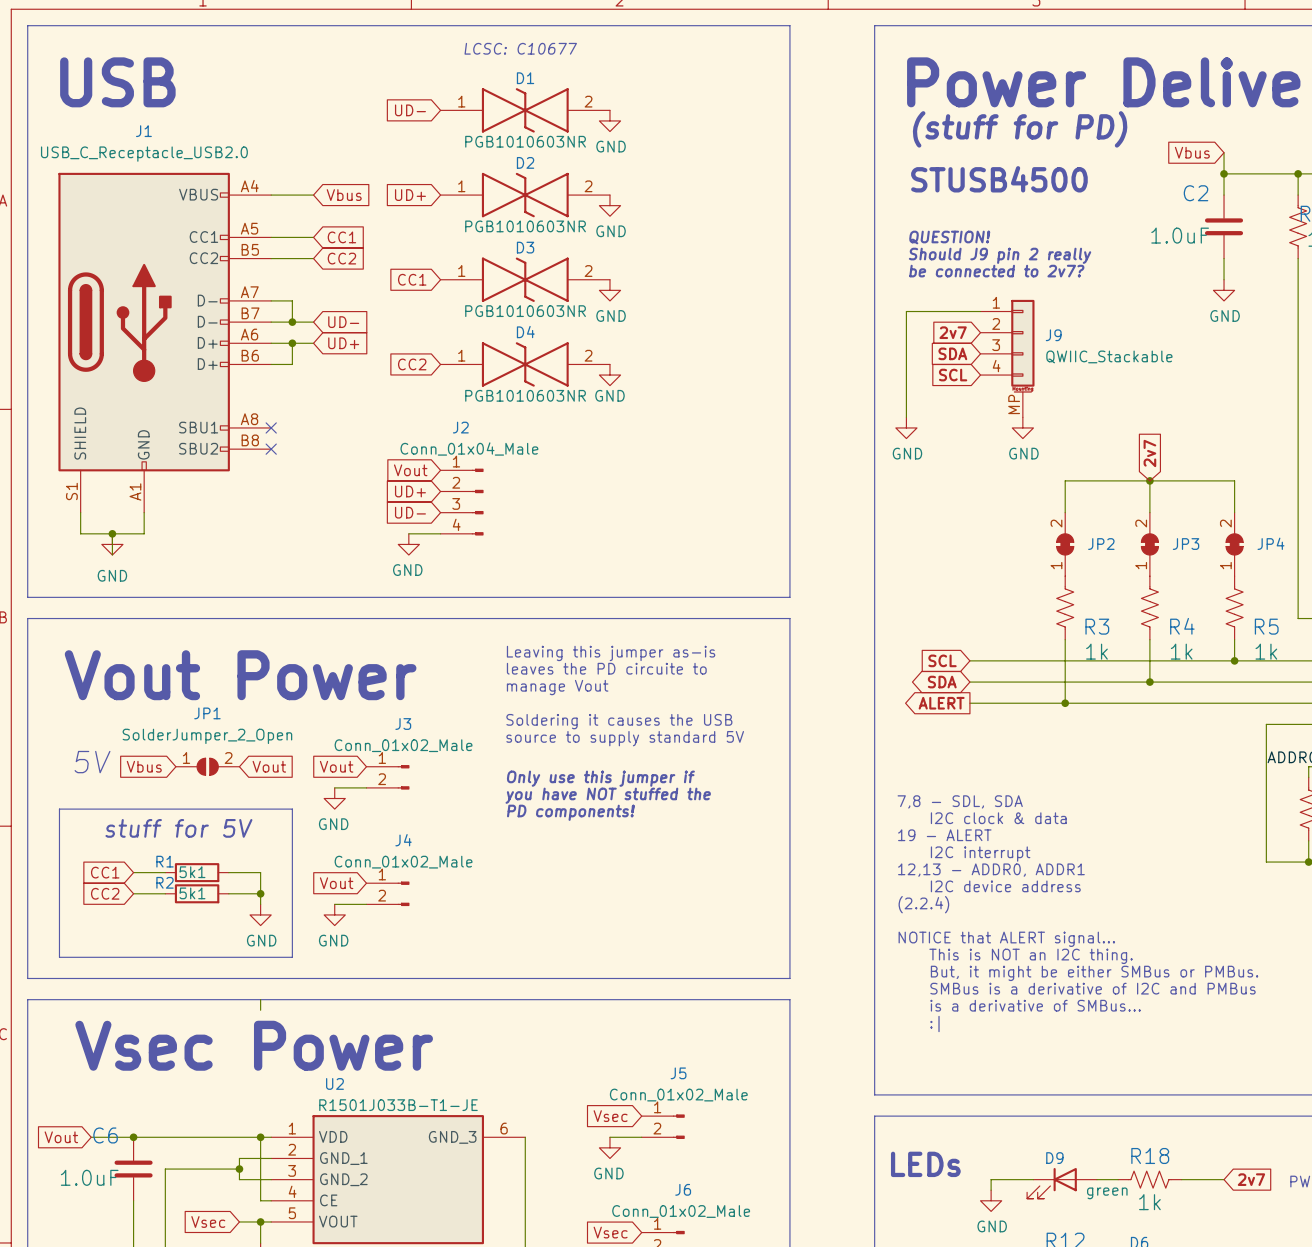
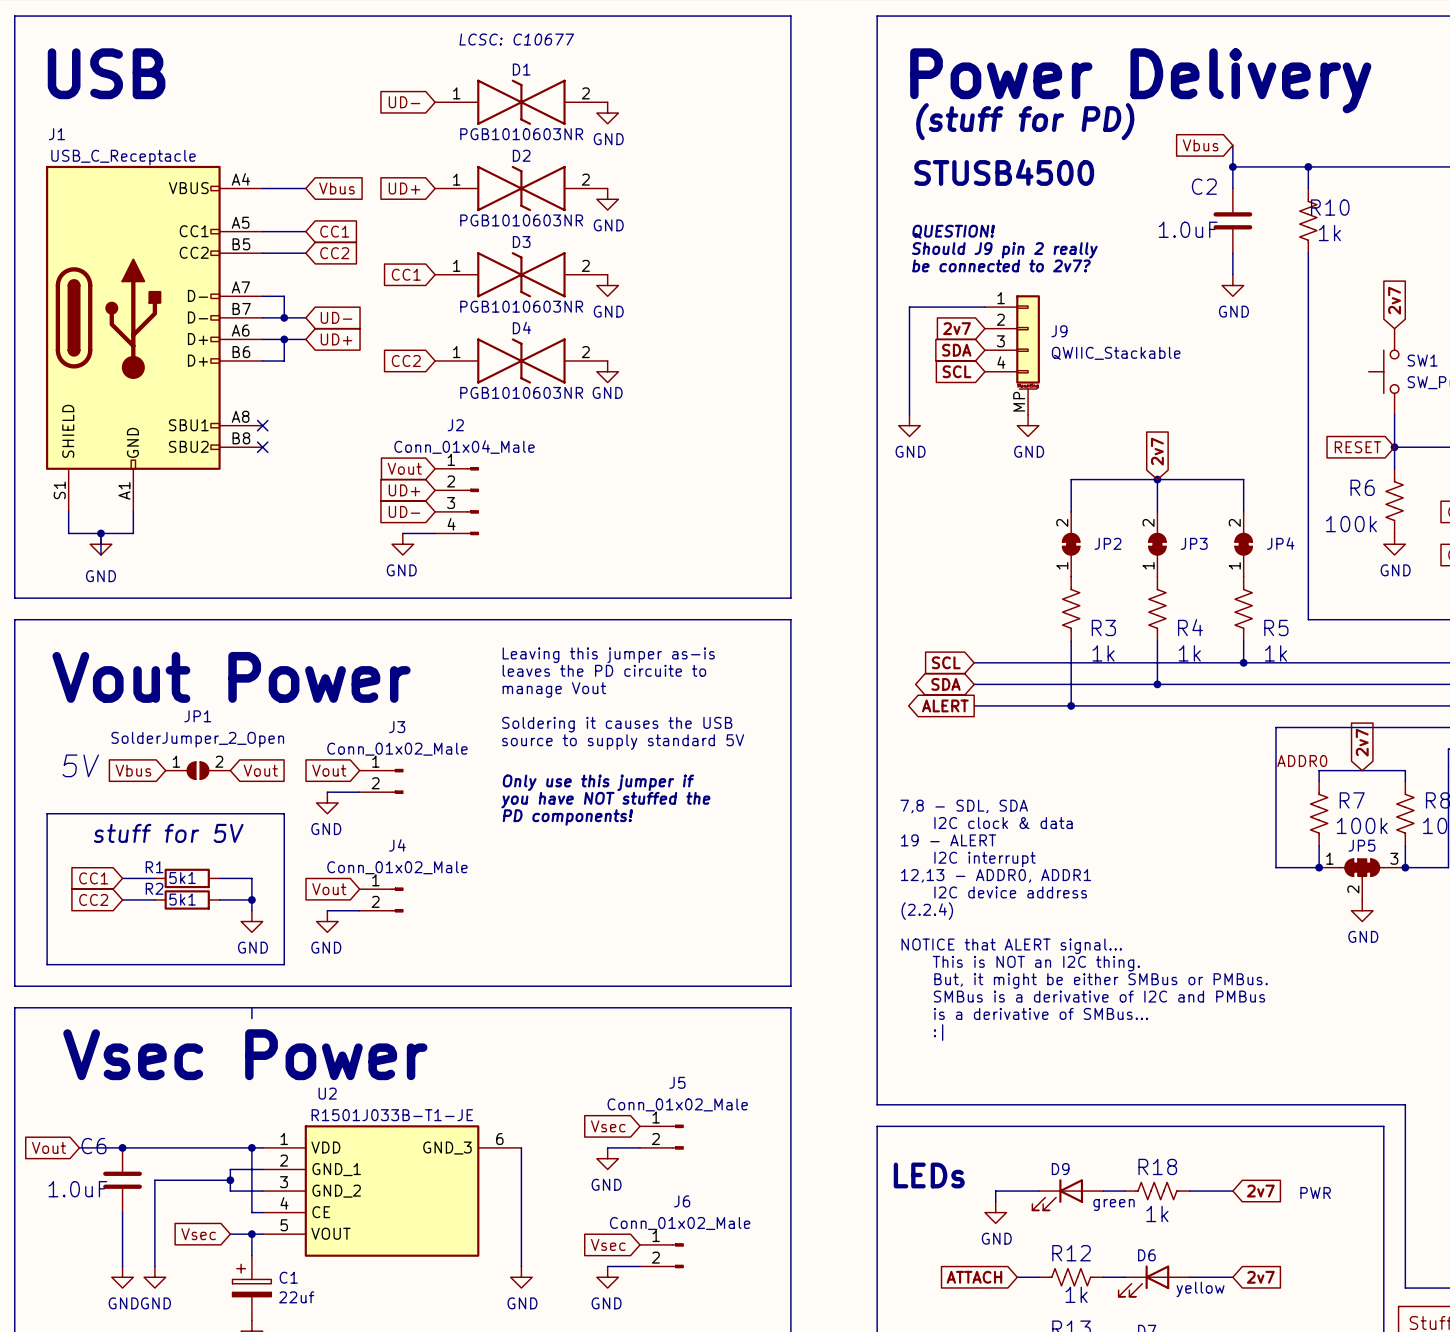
J1 name position: J1 (143, 131) -> J1 (56, 134)
J1 value: USB_C_Receptacle_USB2.0 (144, 154) -> USB_C_Receptacle (123, 157)

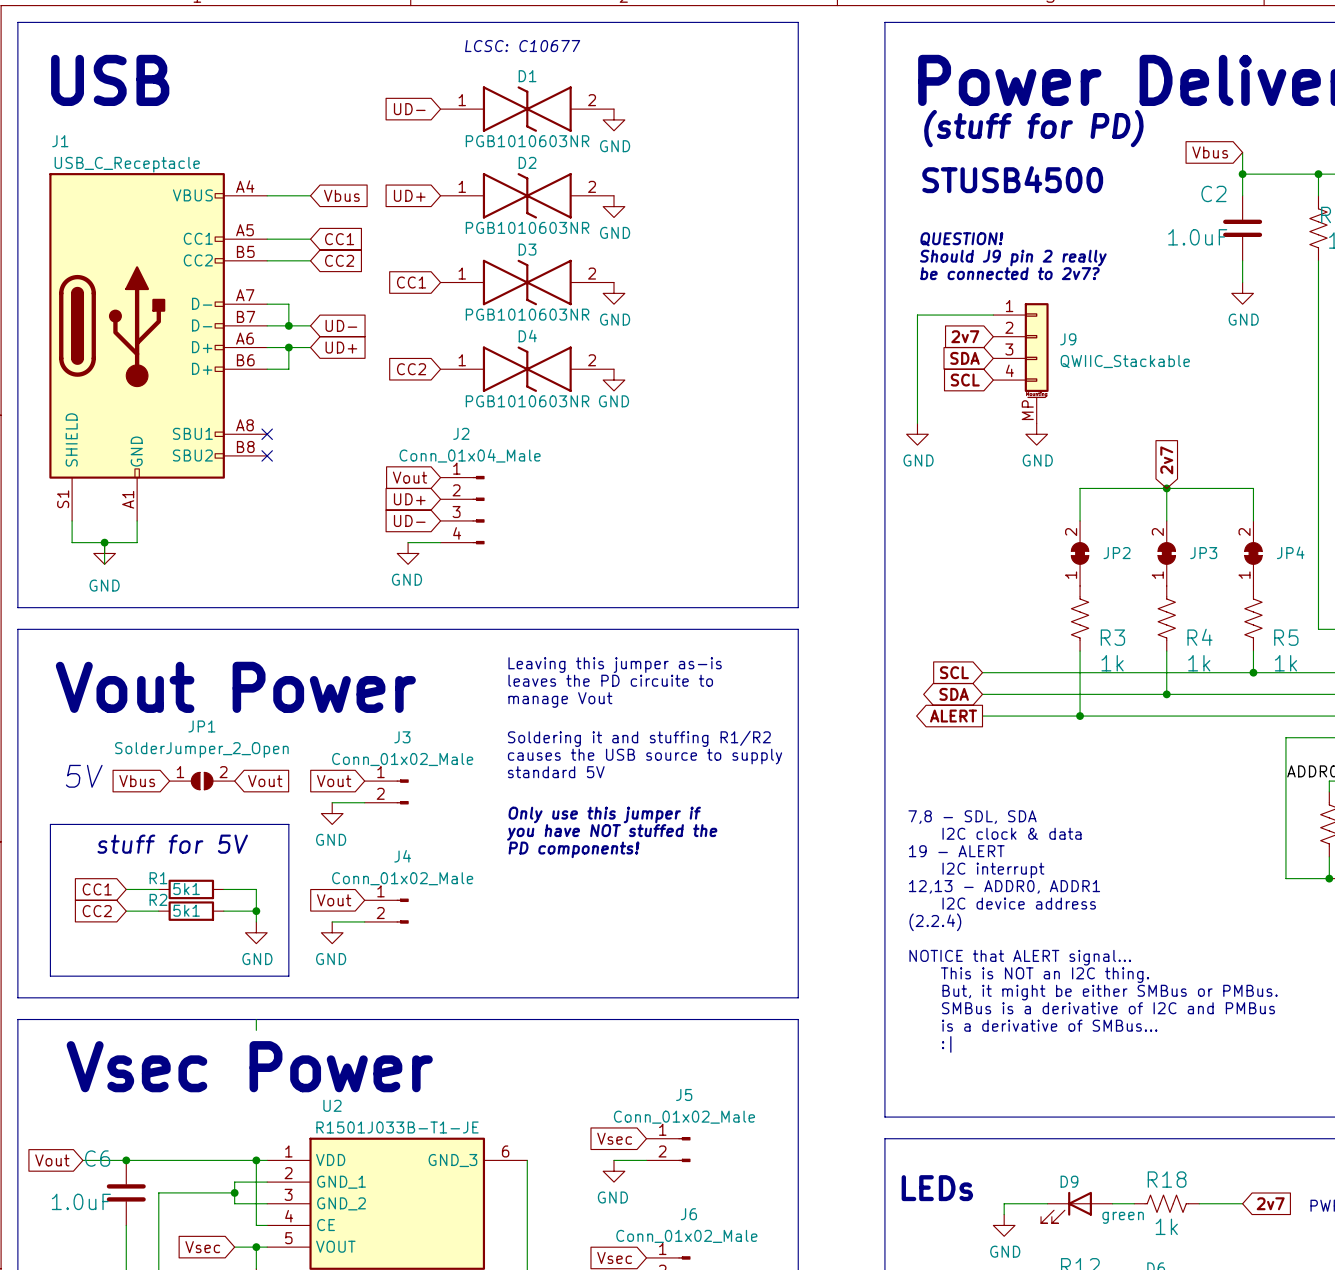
text: Soldering it causes the USB (617, 724) -> Soldering it and stuffing R1/R2 (639, 738)
text: source to supply standard 5V (623, 742) -> causes the USB source to supply (645, 756)
text: none -> standard 5V (556, 772)
text: Only use this jumper if (598, 782) -> none
text: you have NOT stuffed the (605, 800) -> Only use this jumper if (604, 814)
text: PD components! (567, 817) -> you have NOT stuffed the (612, 832)
text: none -> PD components! (574, 849)

